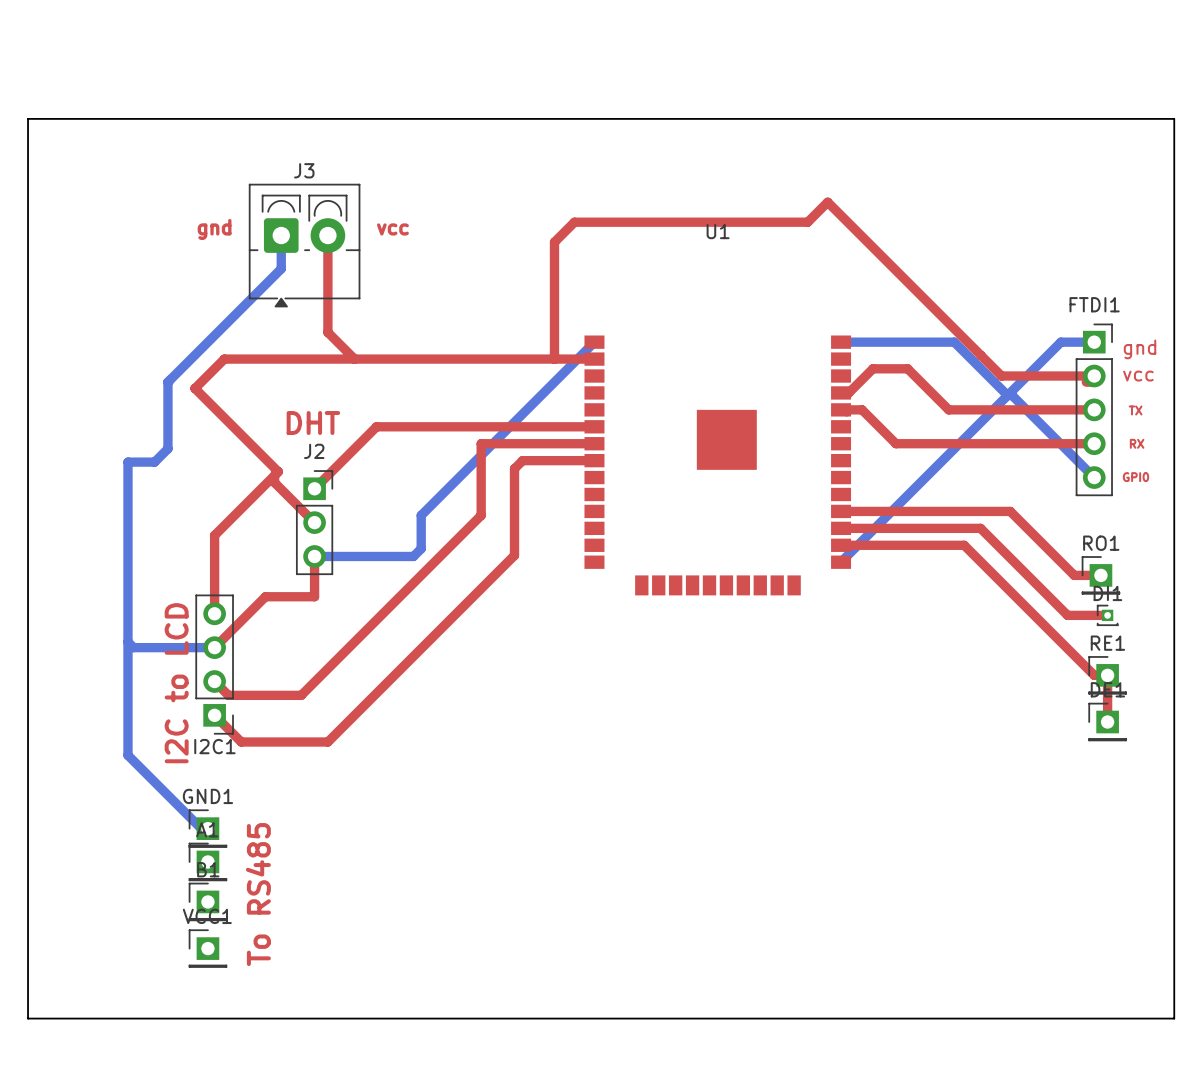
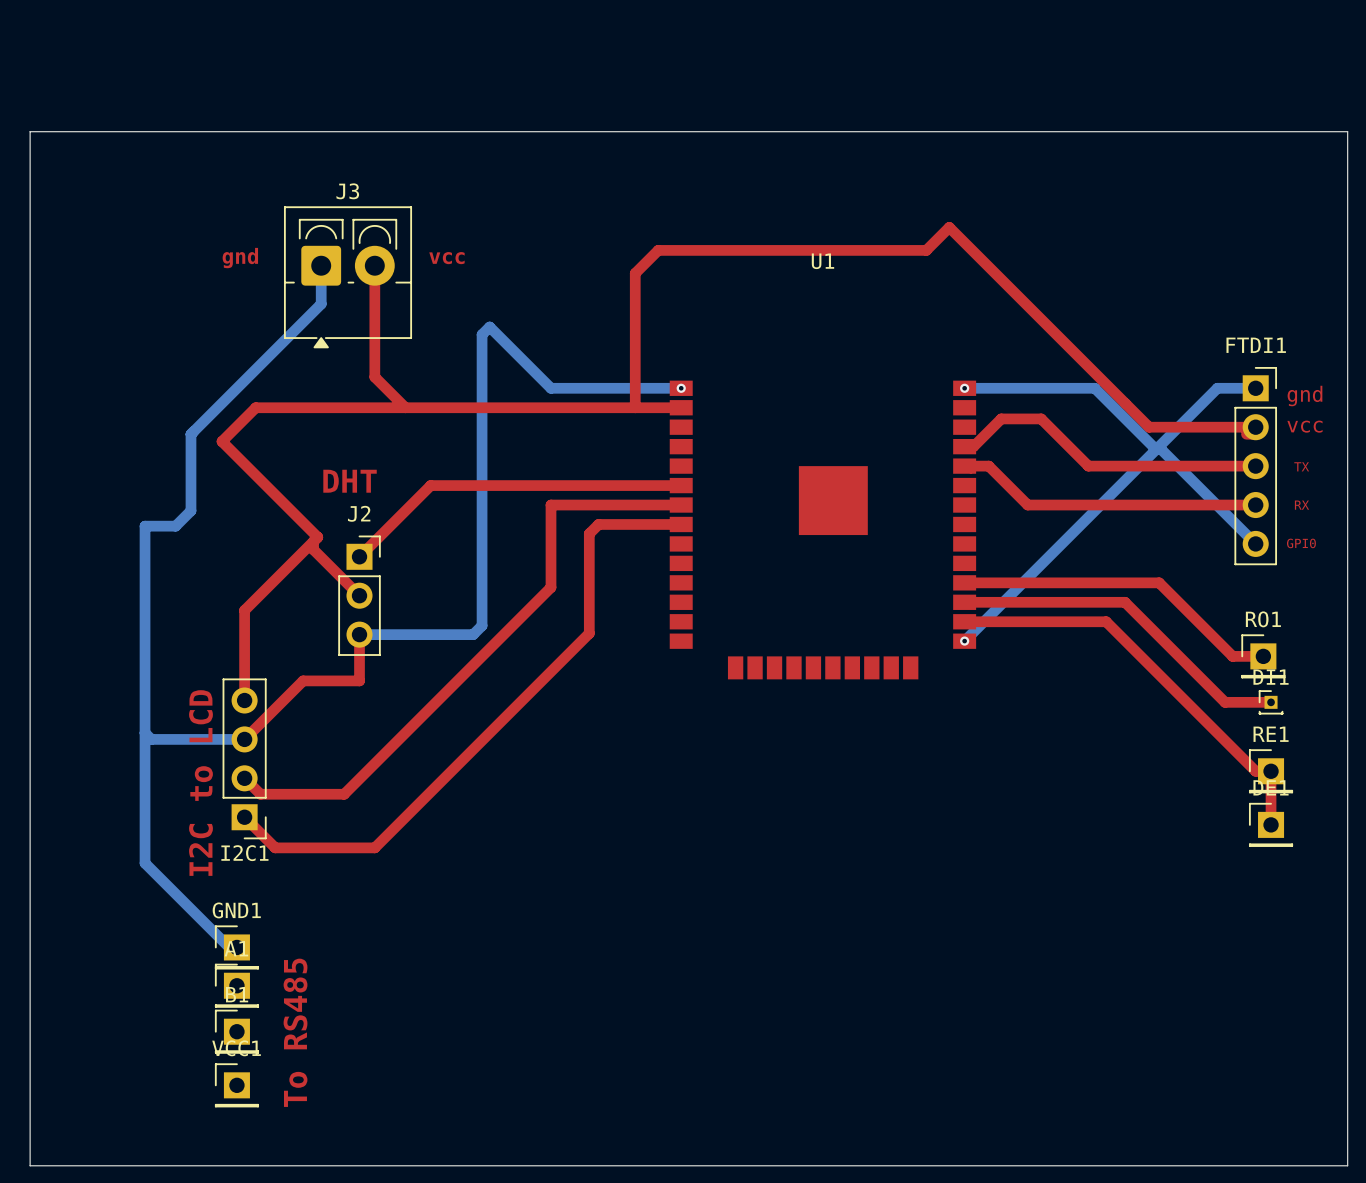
bottom track: (594, 342) (421, 515) -> (681, 388) (551, 388) (489, 327) (482, 334) (482, 587)
via: none -> (681, 388)
via: none -> (964, 388)
via: none -> (964, 641)

